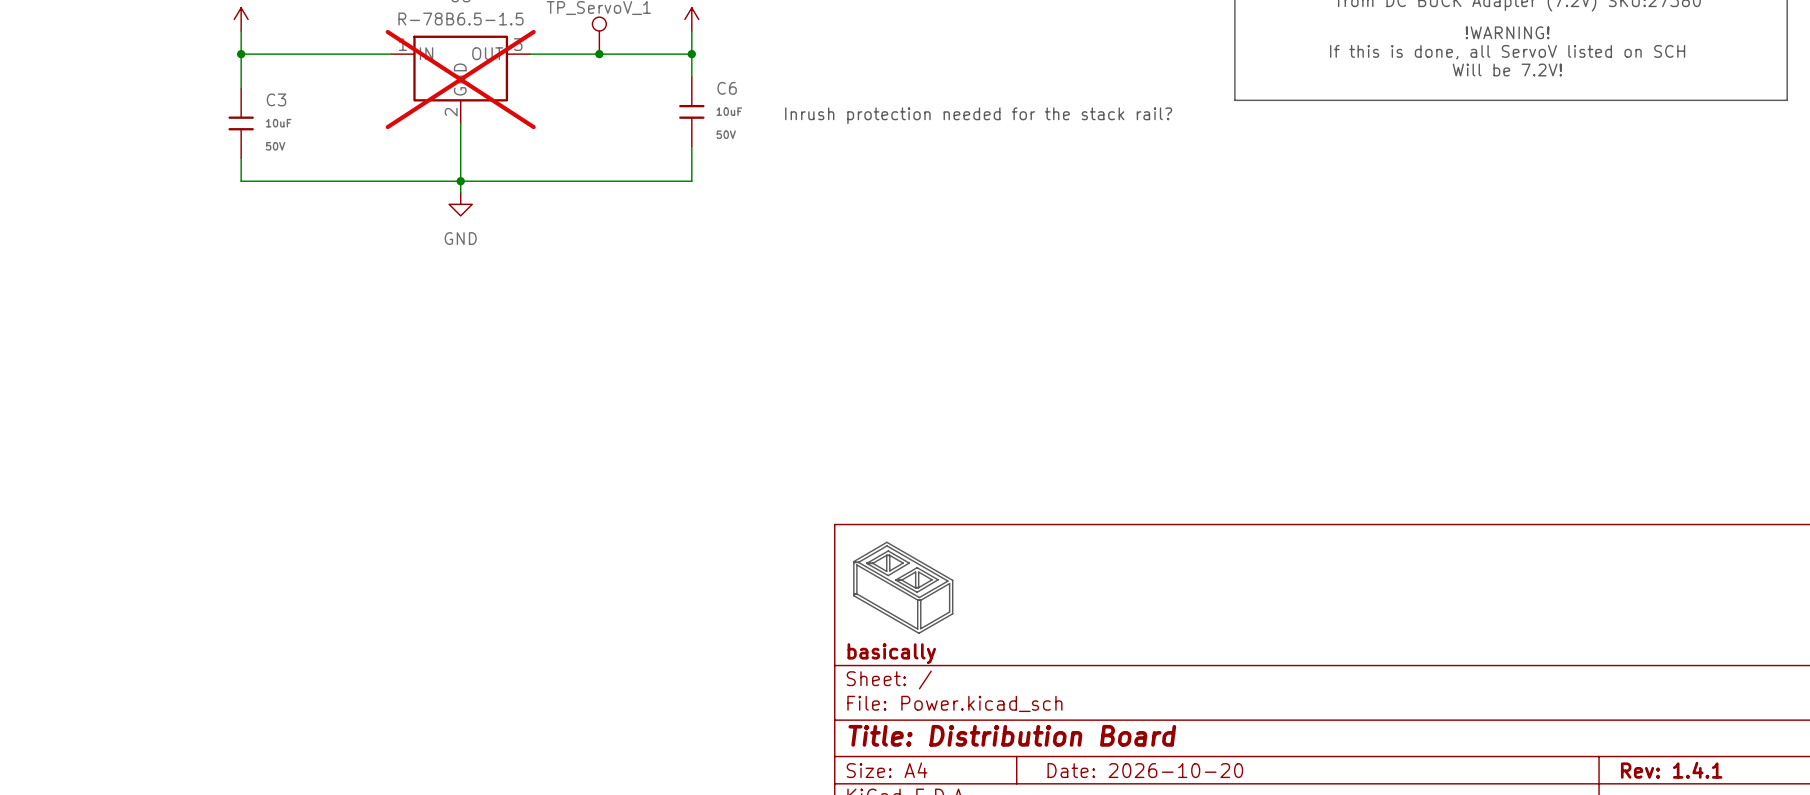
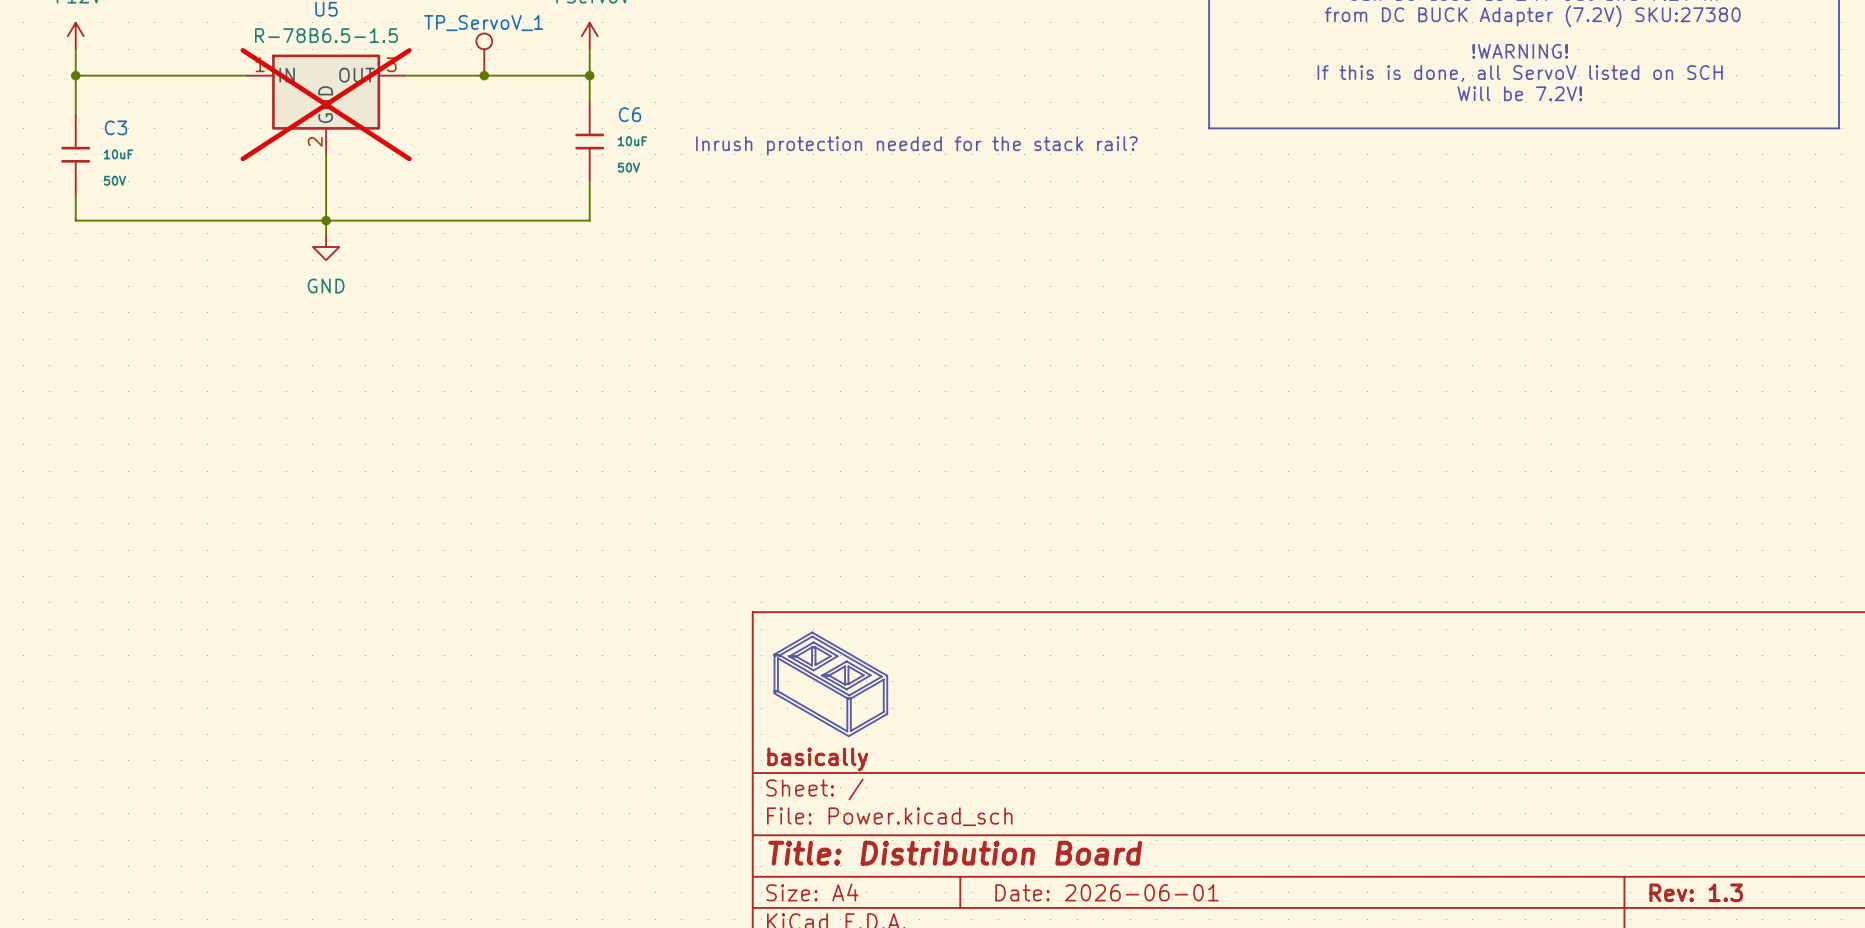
title block: Date: 2026-10-20 (1145, 770) -> Date: 2026-06-01 (1106, 892)
title block: Rev: 1.4.1 (1671, 770) -> Rev: 1.3 (1696, 892)

